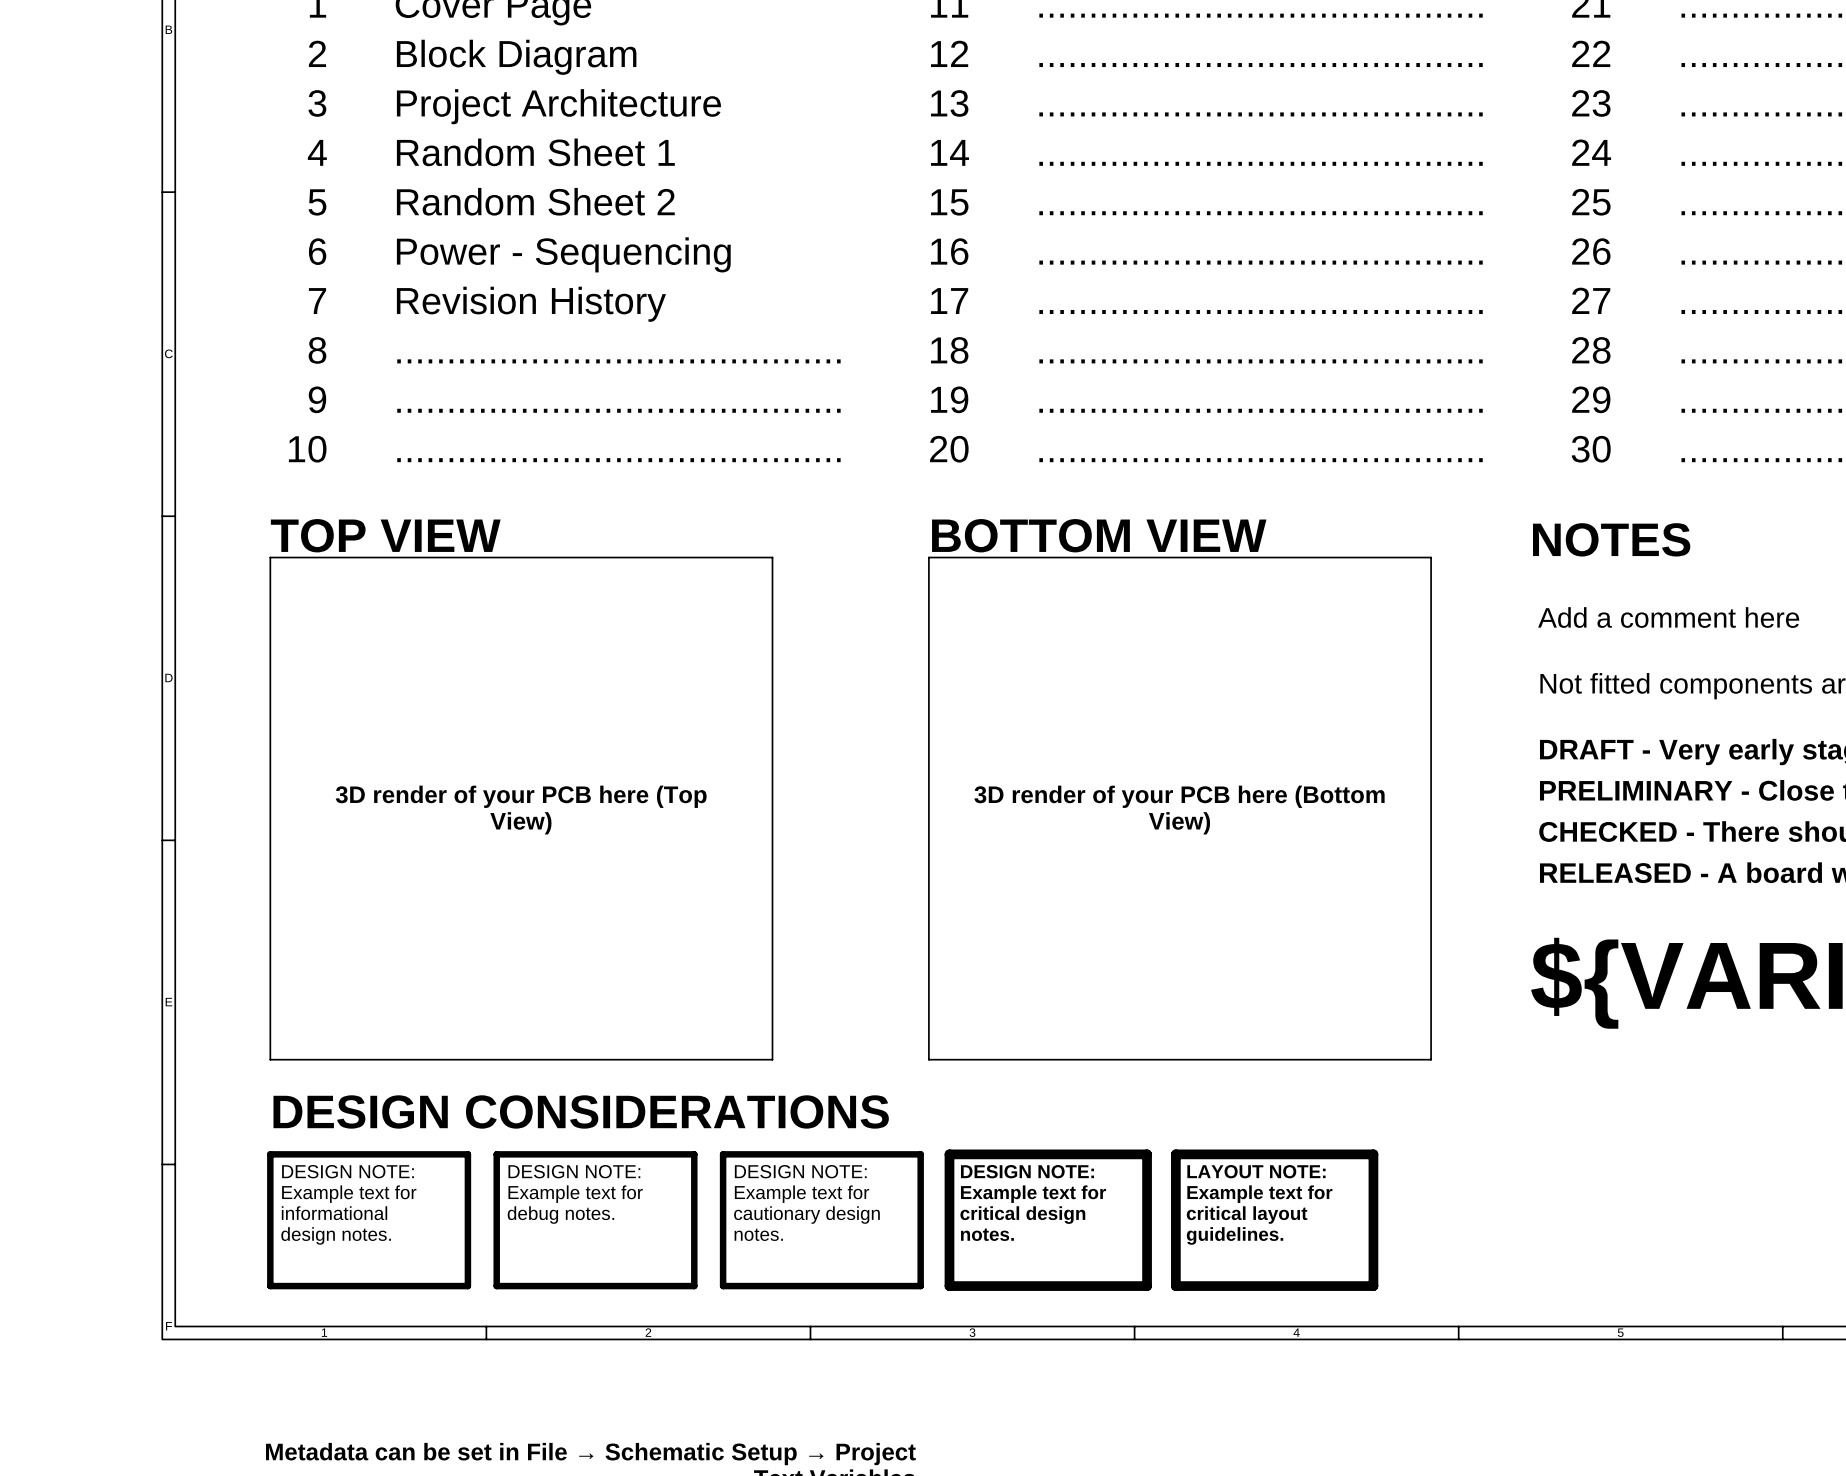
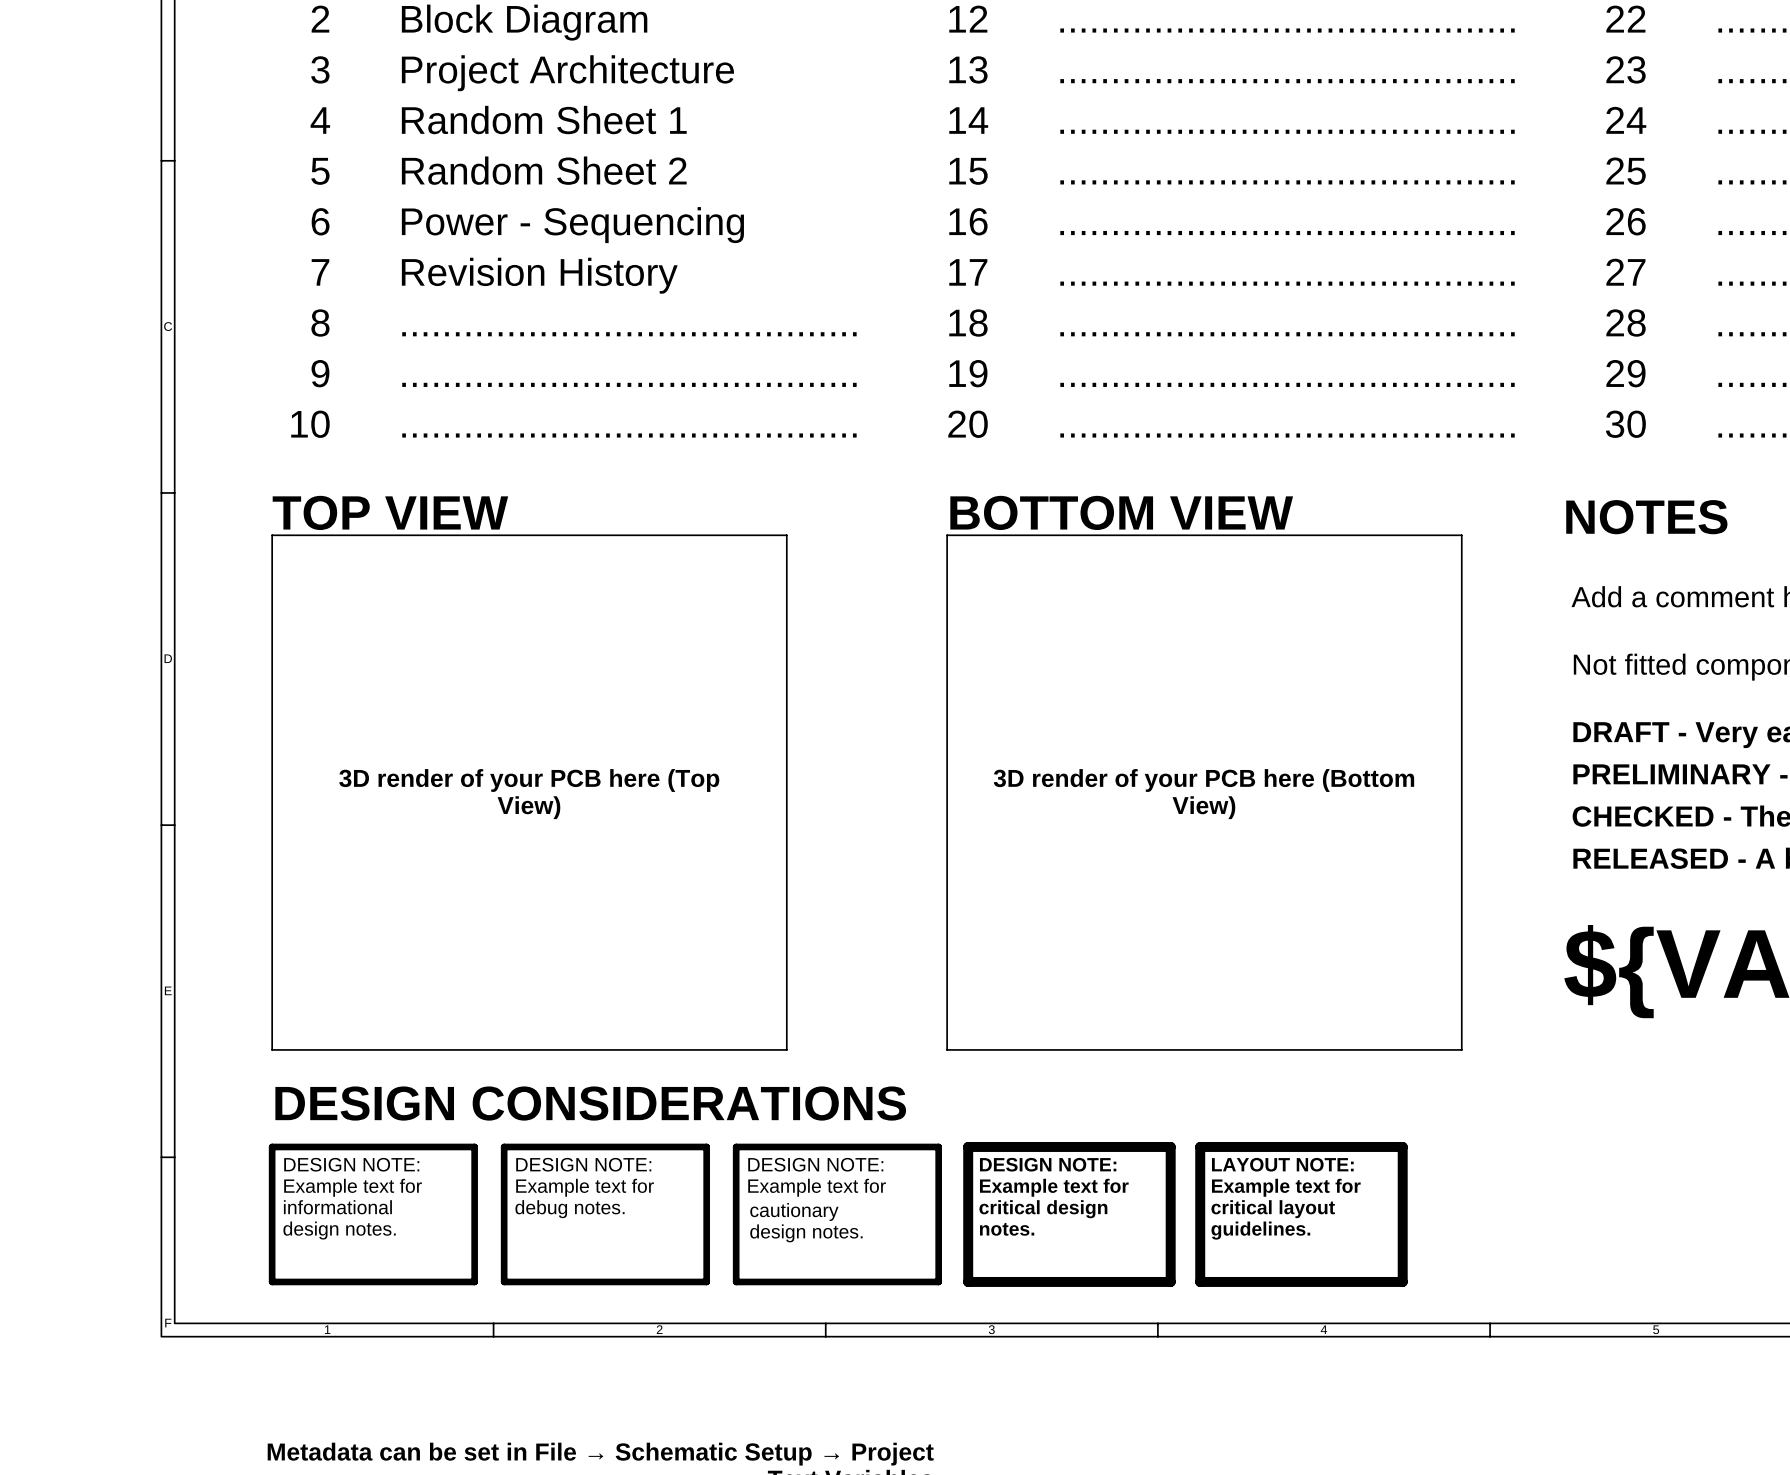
text: cautionary design (806, 1215) -> cautionary (794, 1211)
text: notes. (758, 1234) -> design notes. (806, 1233)

